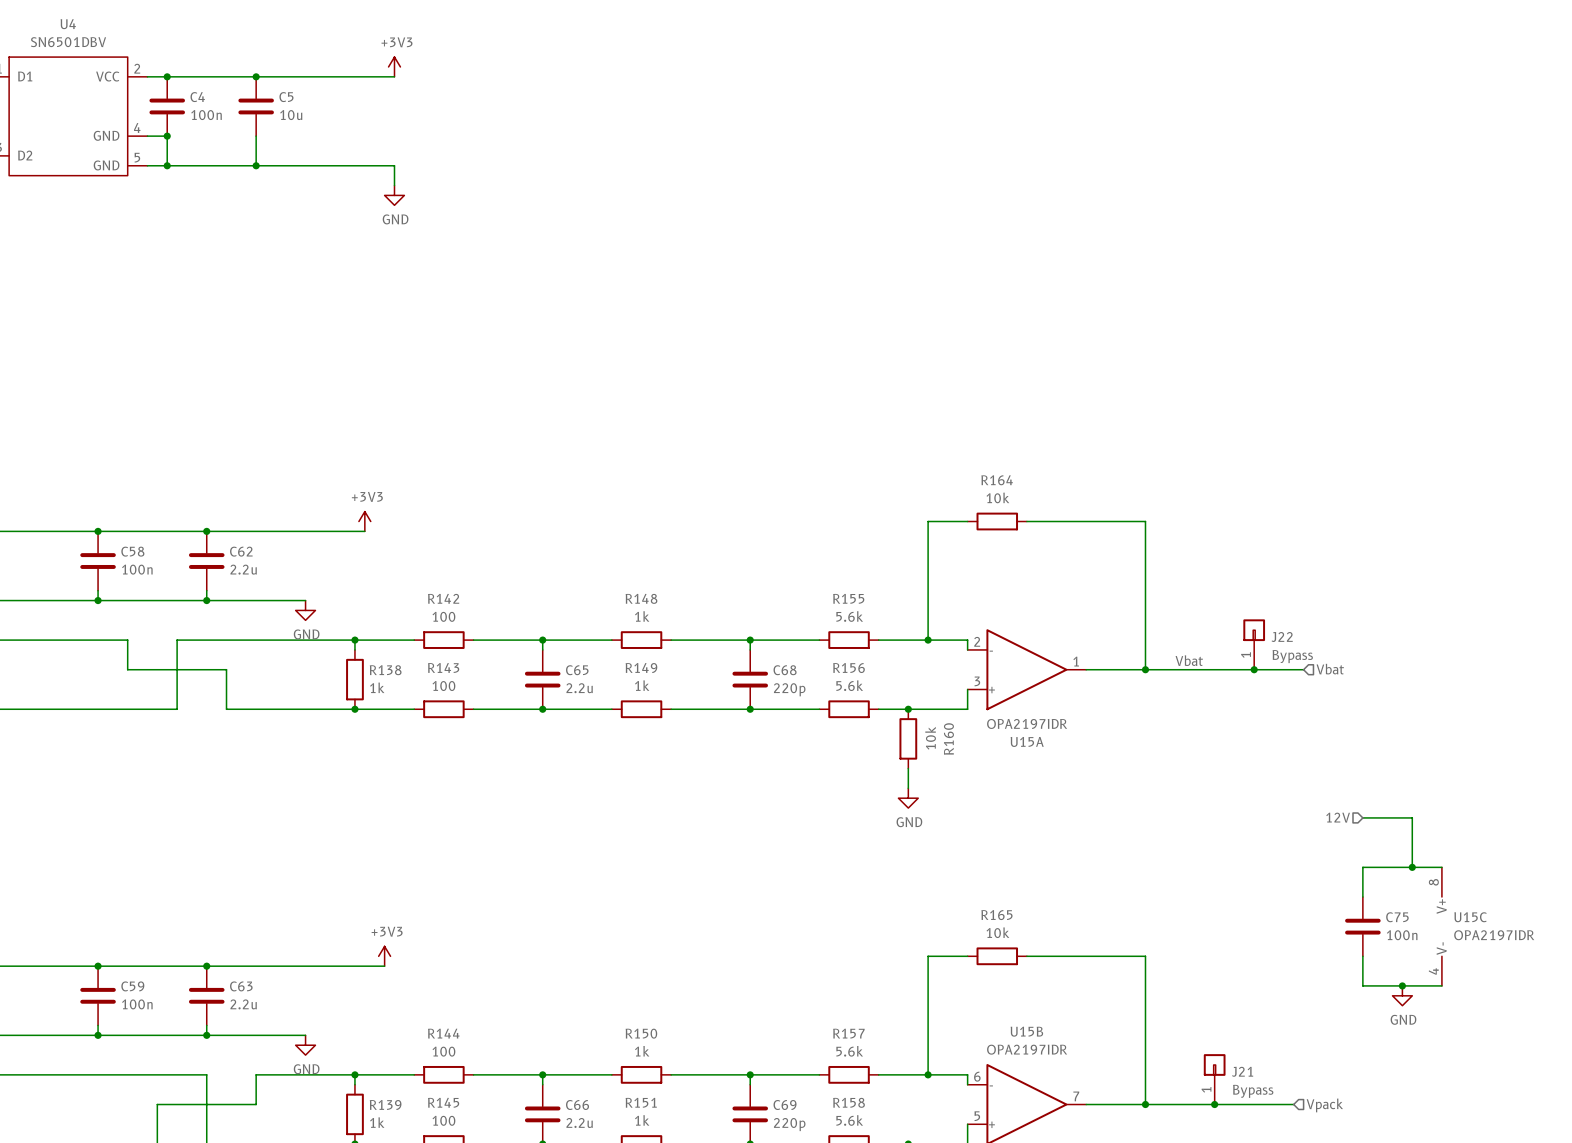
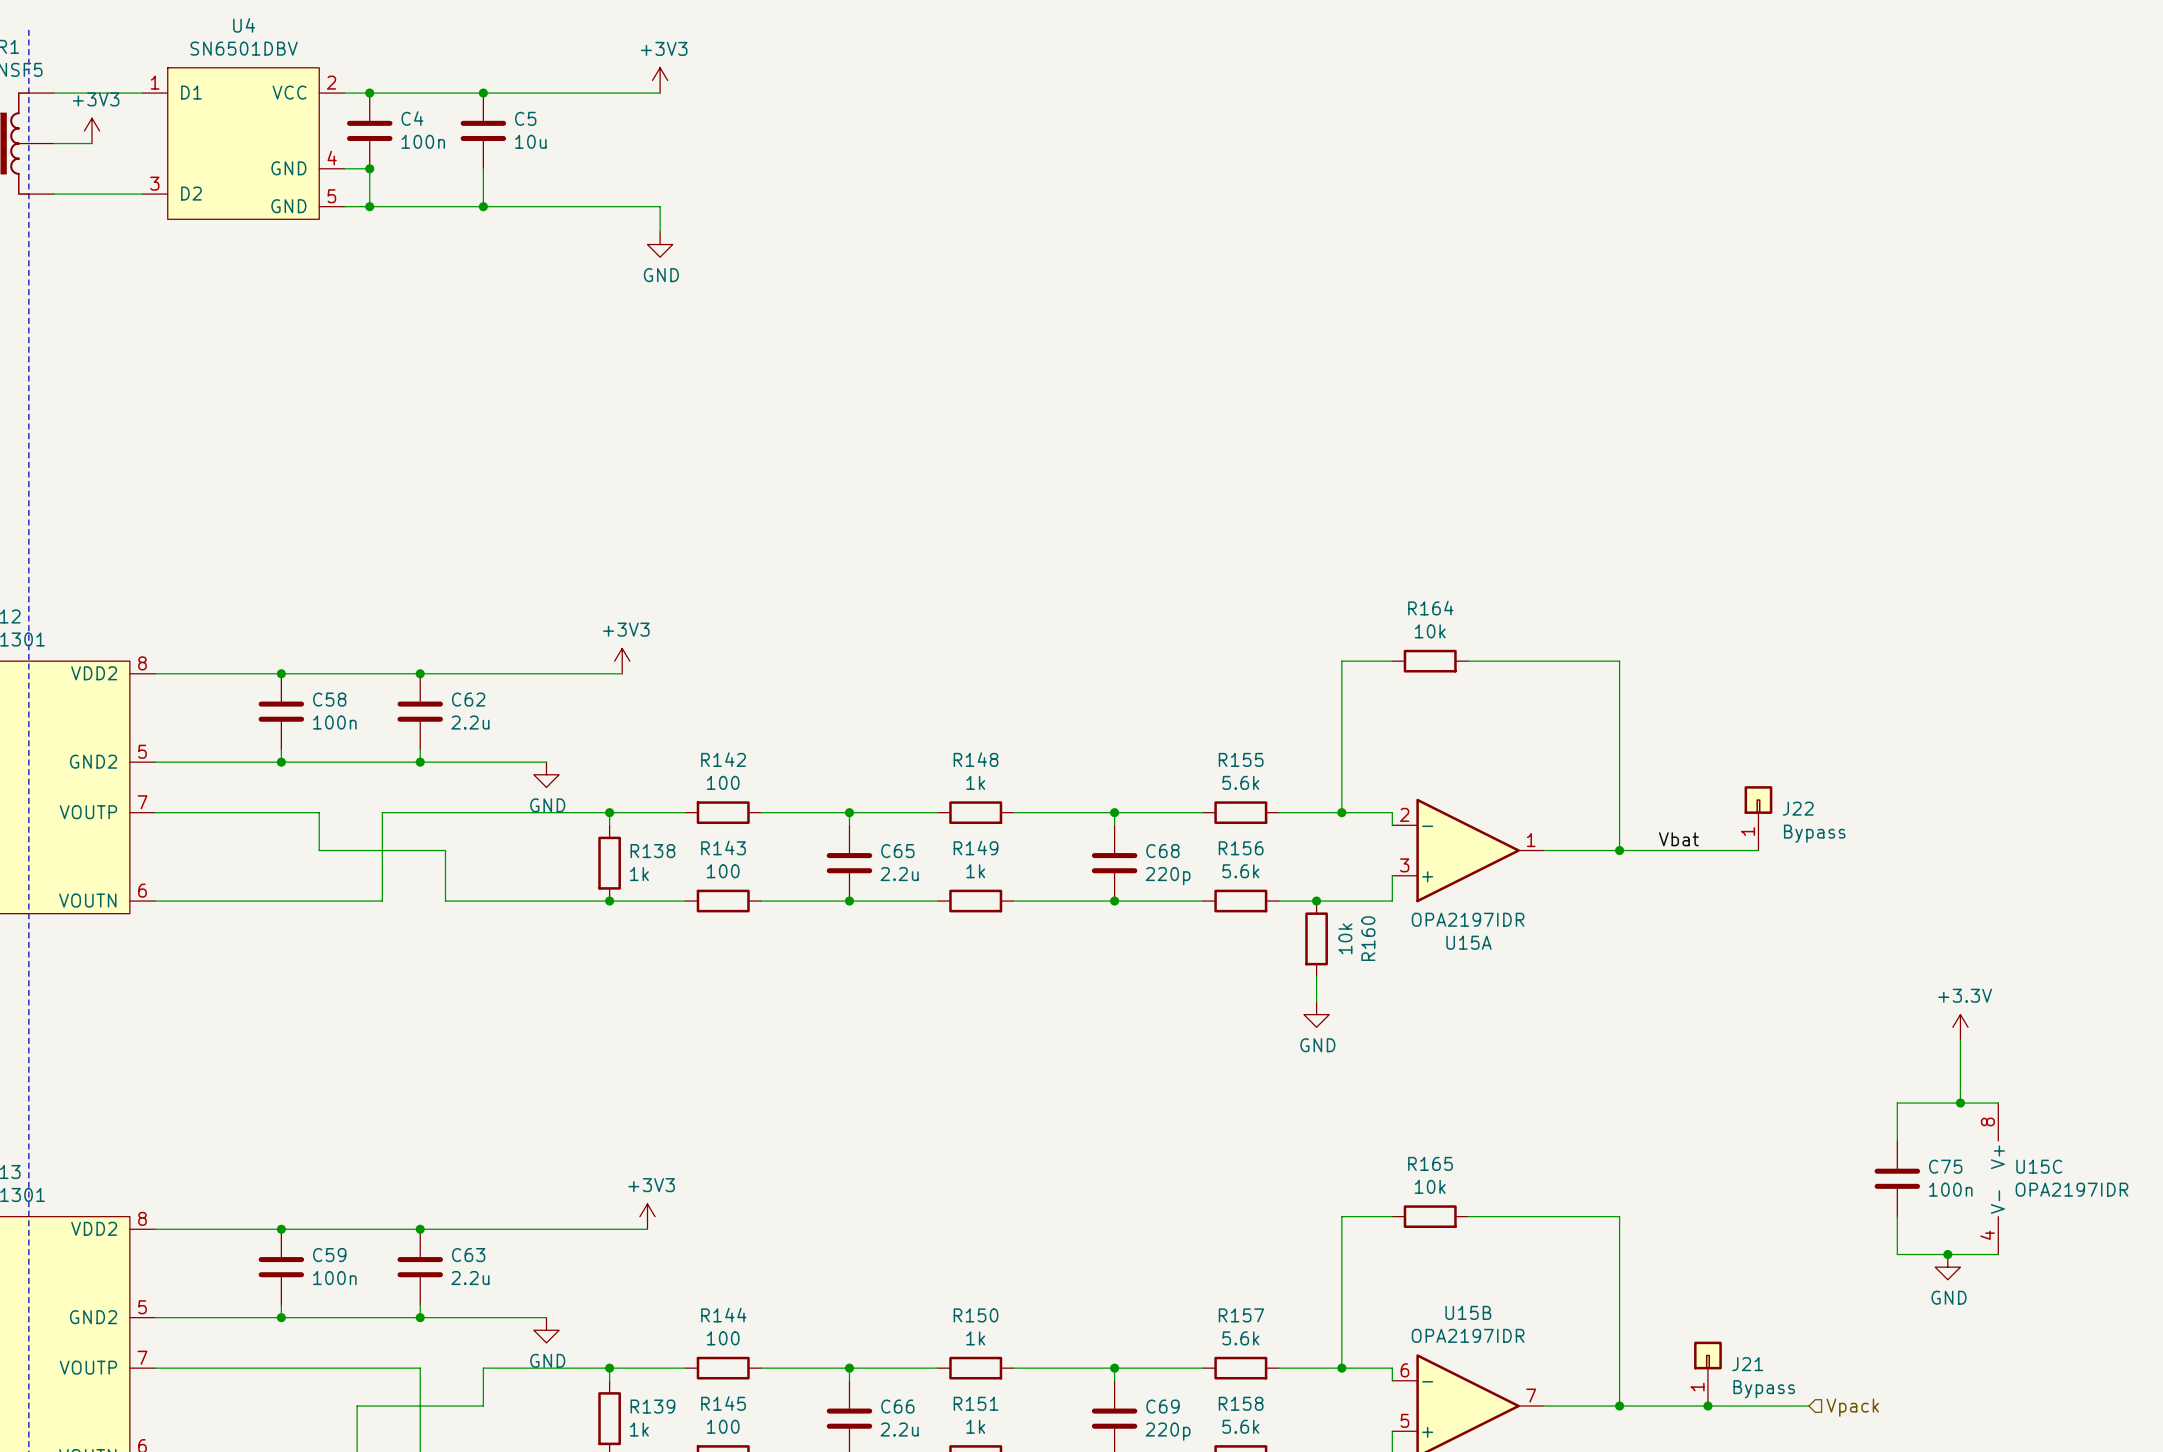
wire: (1254, 669) (1303, 669) -> none
junction: (1254, 669) -> none
hierarchical label: Vbat (1330, 669) -> none
power symbol: none -> +3.3V (1960, 1027)
hierarchical label: 12V (1338, 817) -> none
wire: (1362, 817) (1412, 817) -> none

